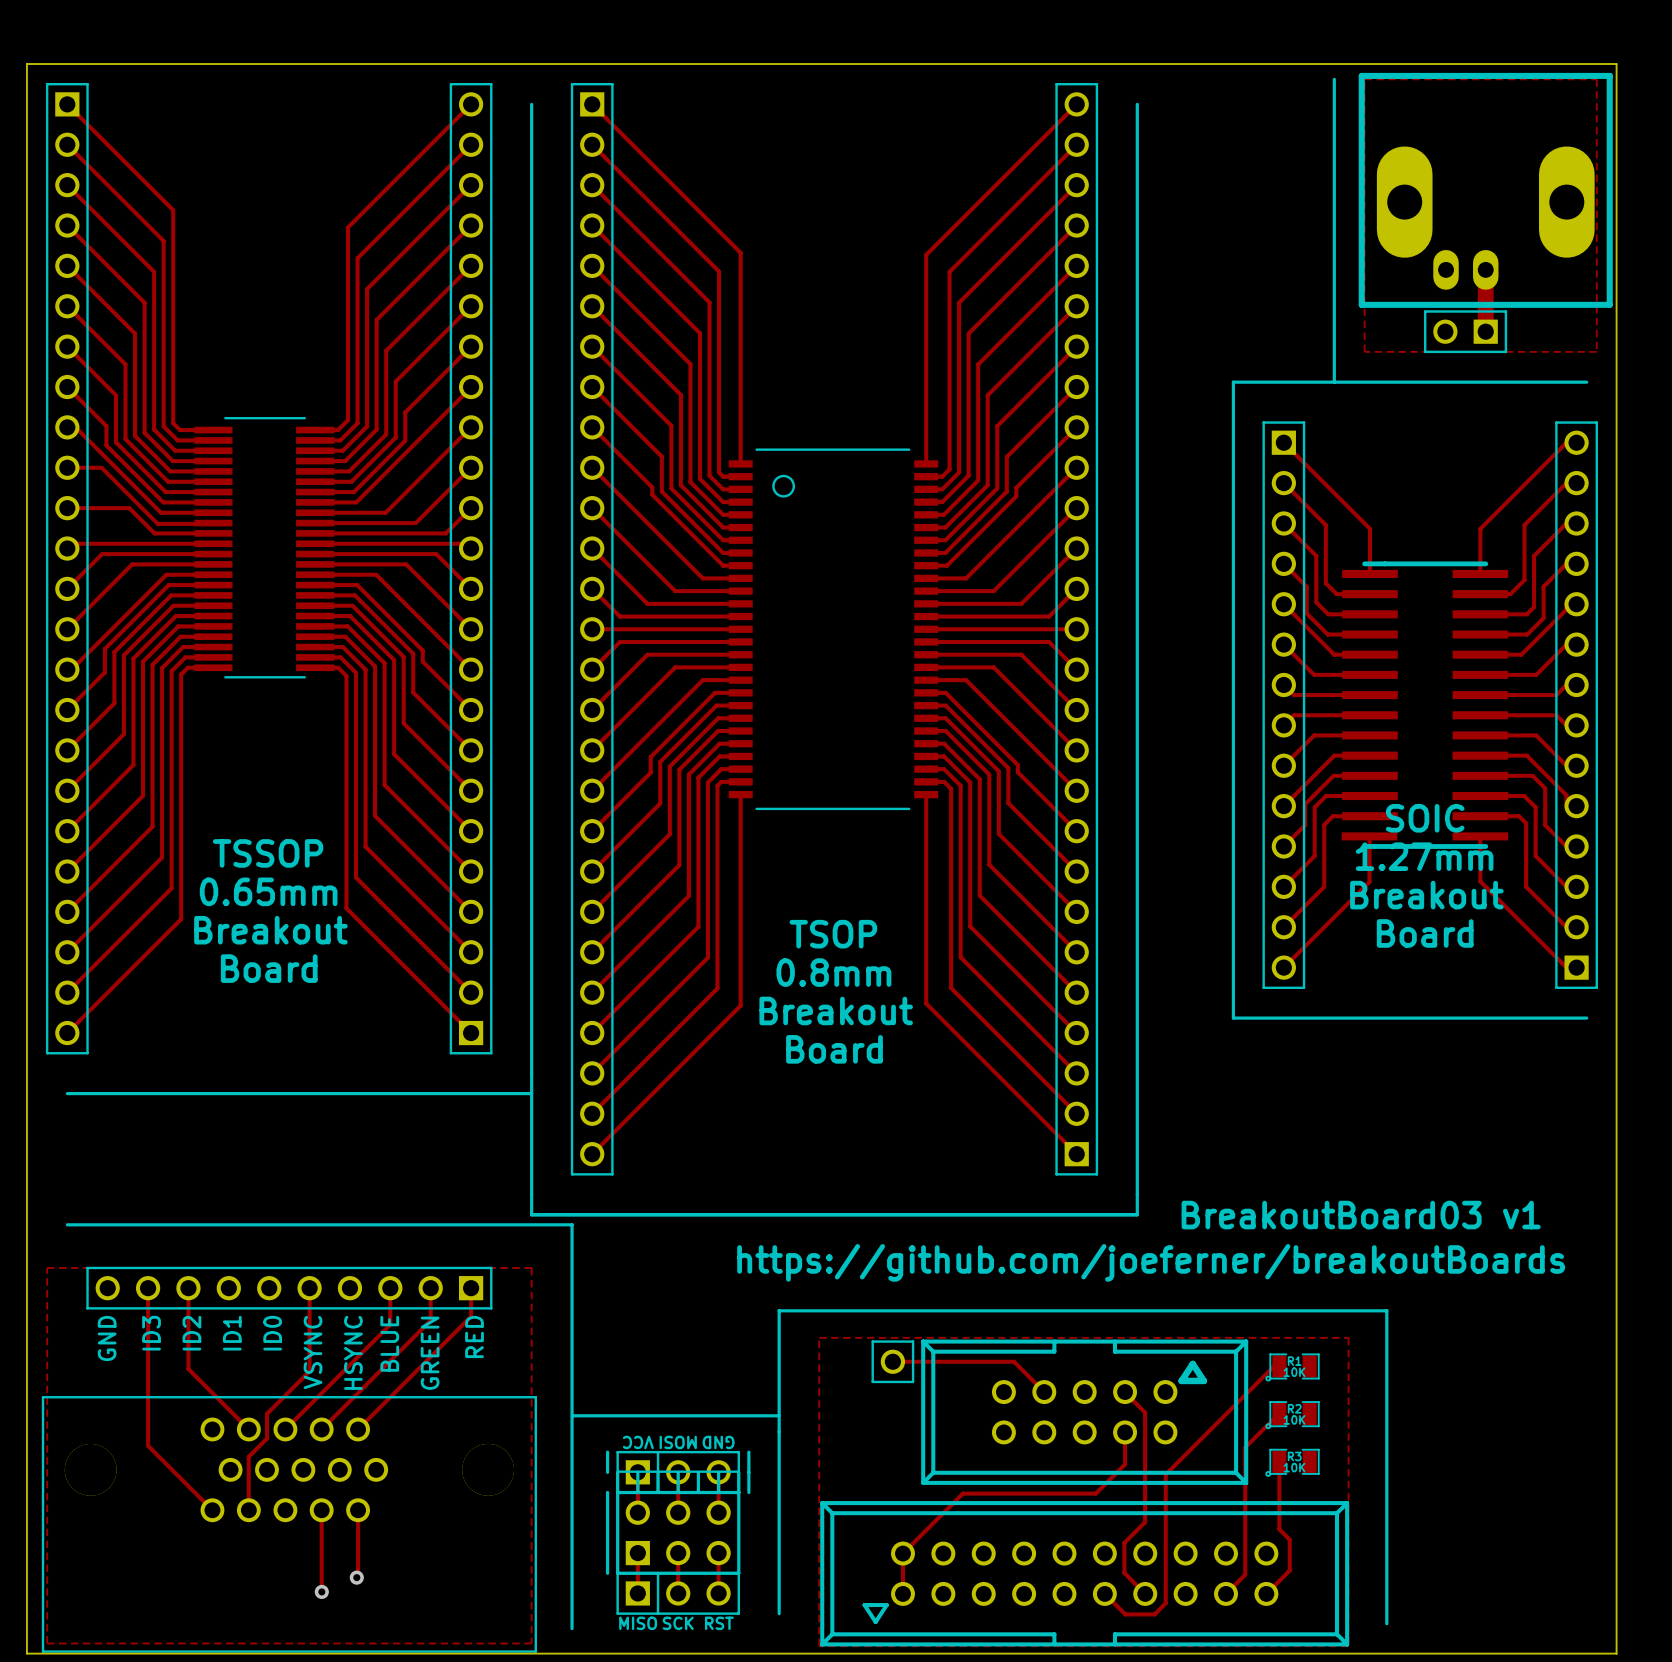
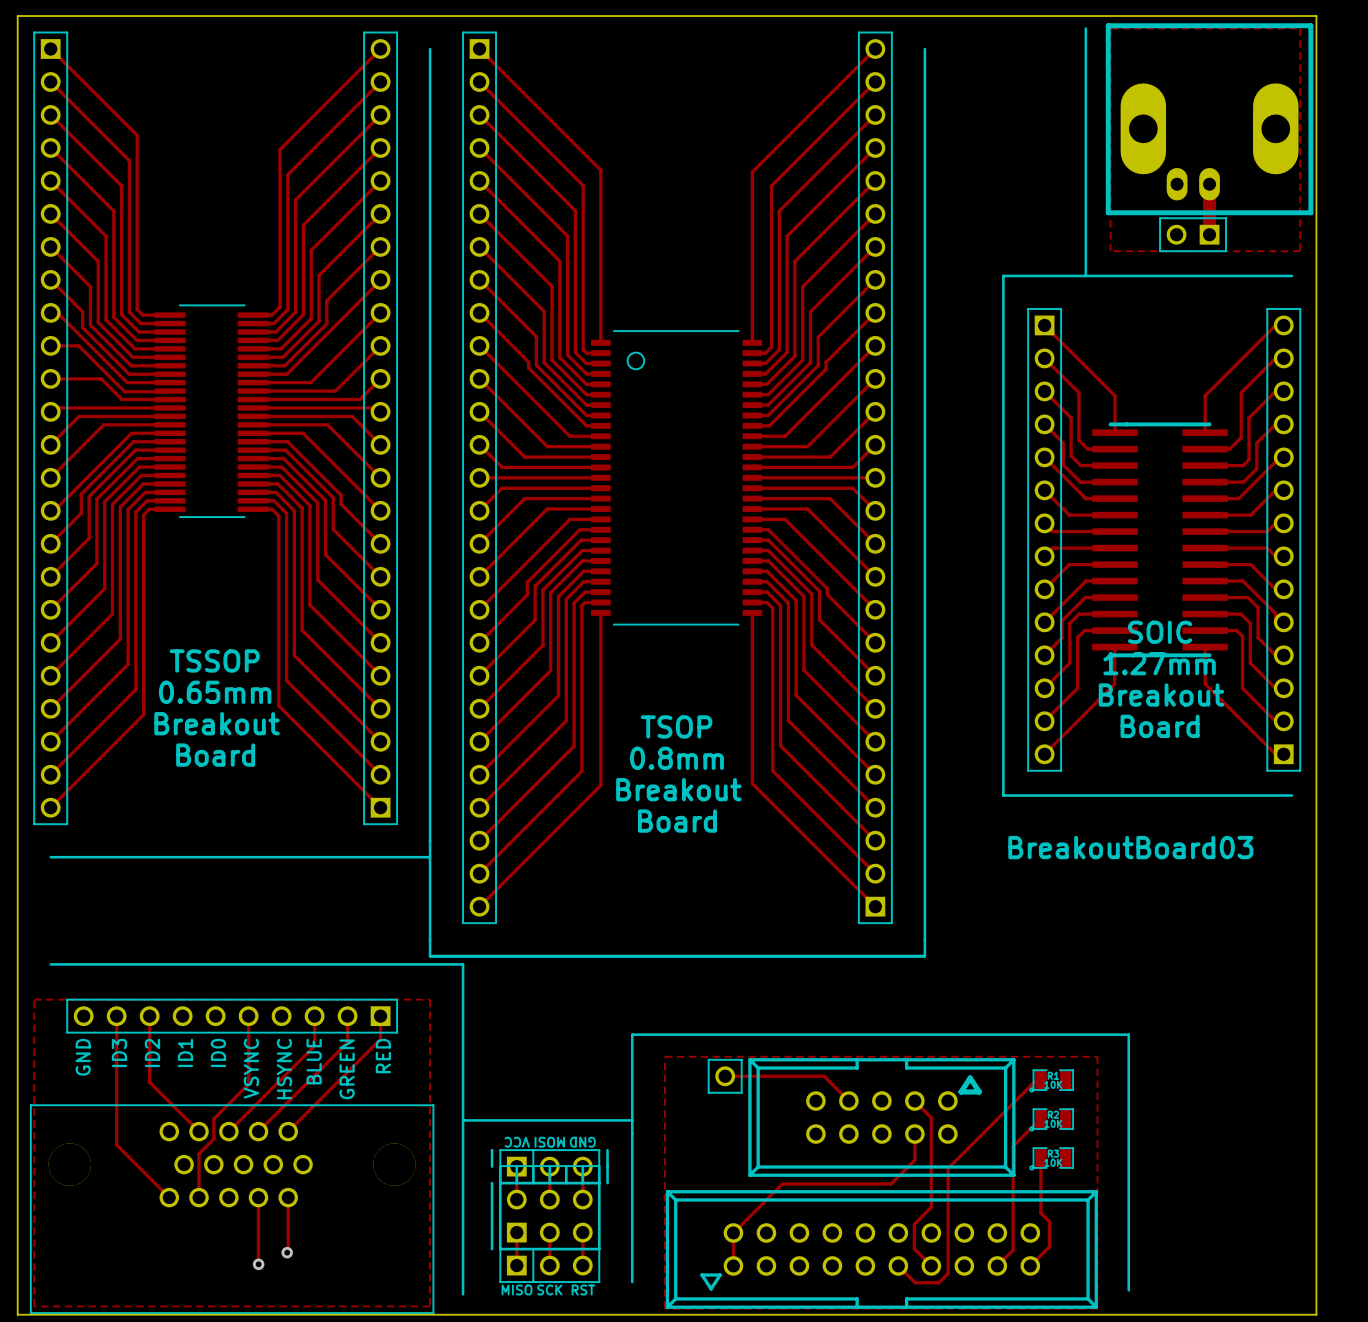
text: none -> BreakoutBoard03 (1130, 847)
text: BreakoutBoard03 v1 (1361, 1215) -> none
text: https://github.com/joeferner/breakoutBoards (1151, 1262) -> none

